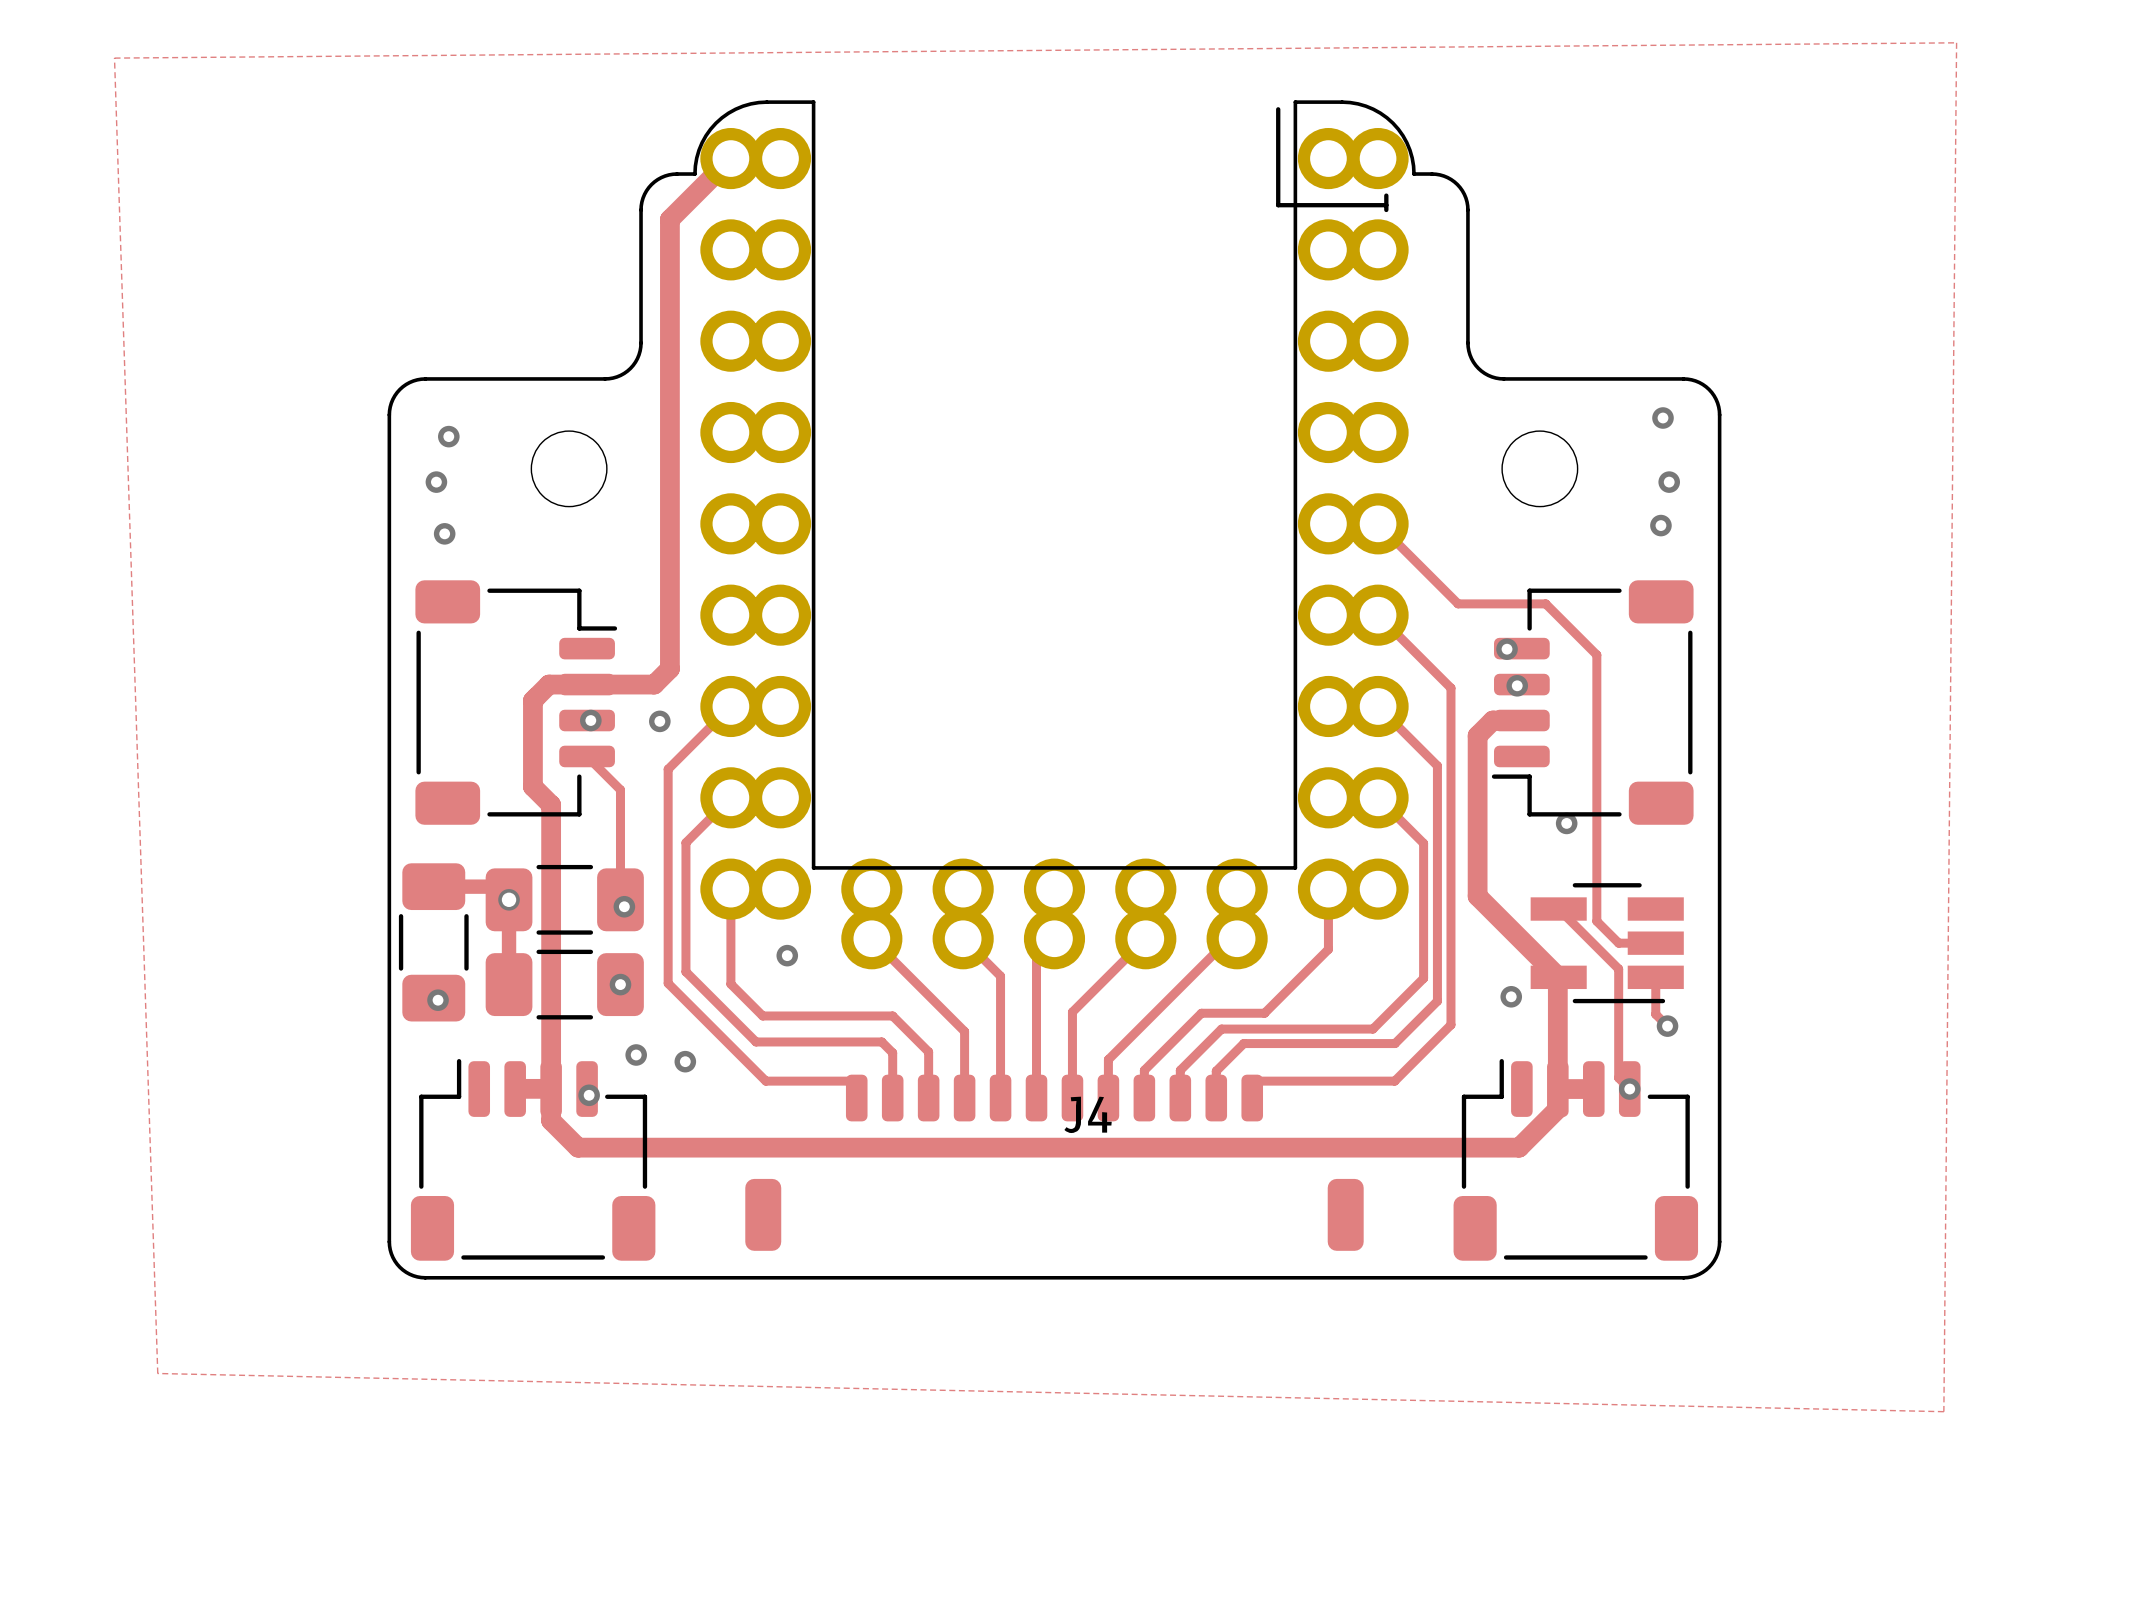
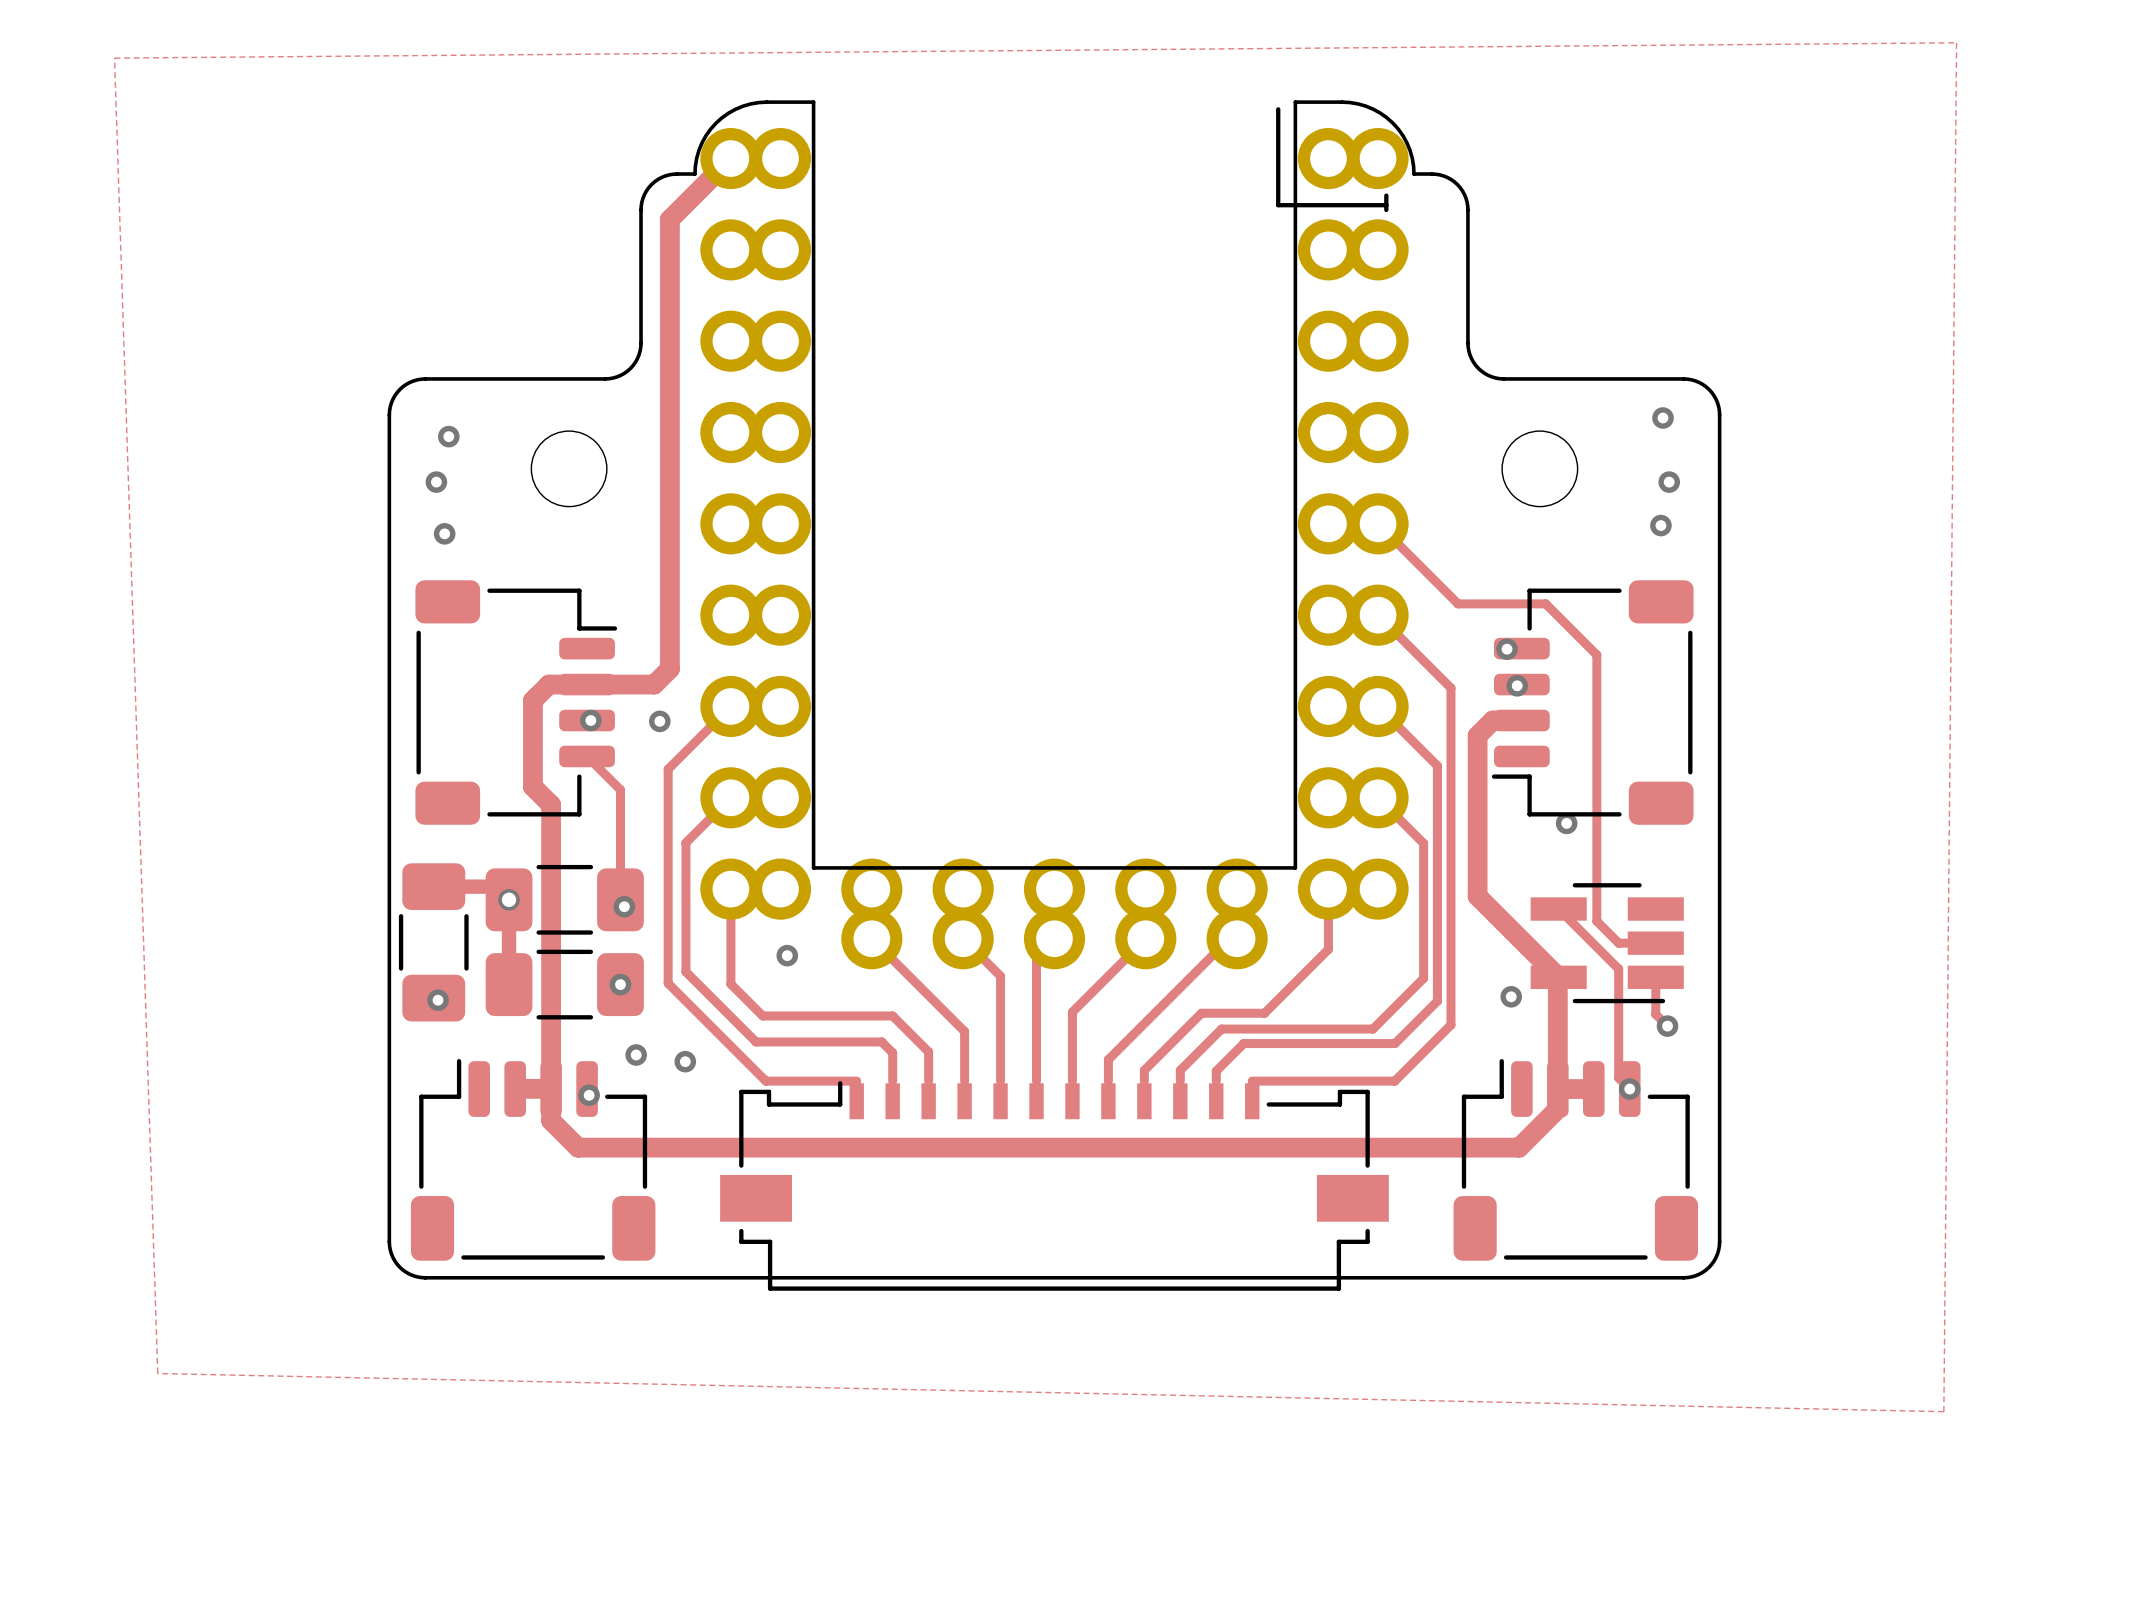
J4: (1054, 1162) -> none
part: none -> (1054, 1185)

